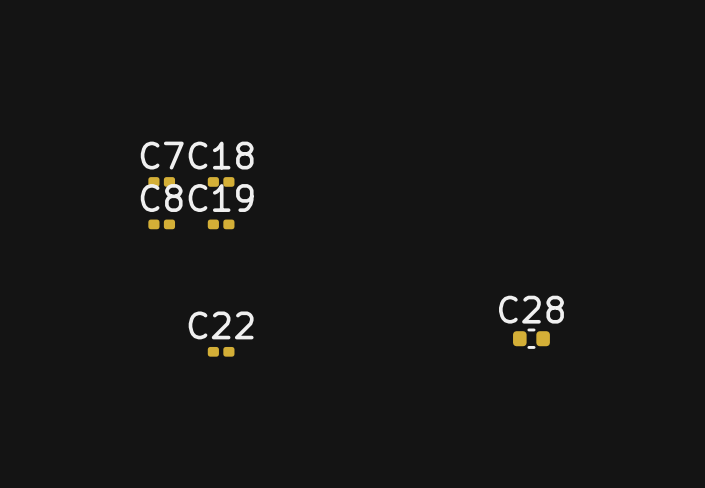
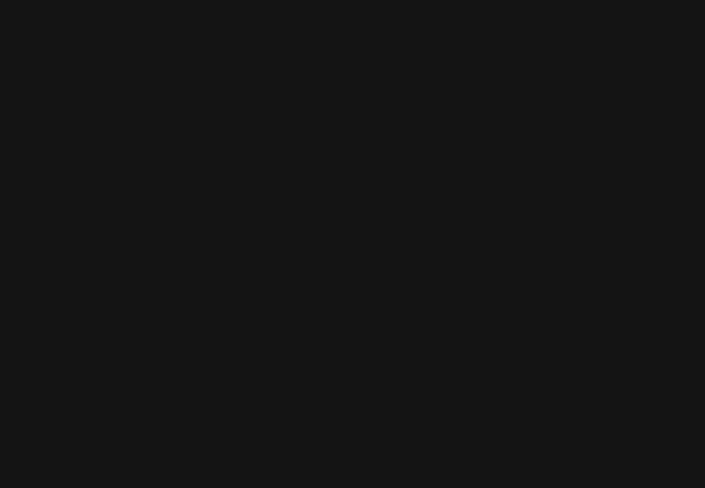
C7: (161, 181) -> none
C18: (221, 181) -> none
C8: (161, 224) -> none
C19: (221, 224) -> none
C28: (531, 338) -> none
C22: (221, 351) -> none

